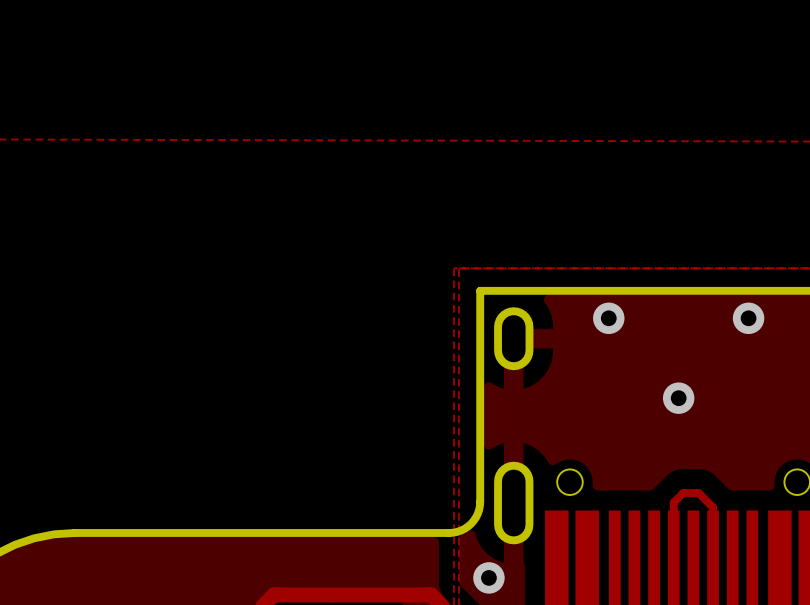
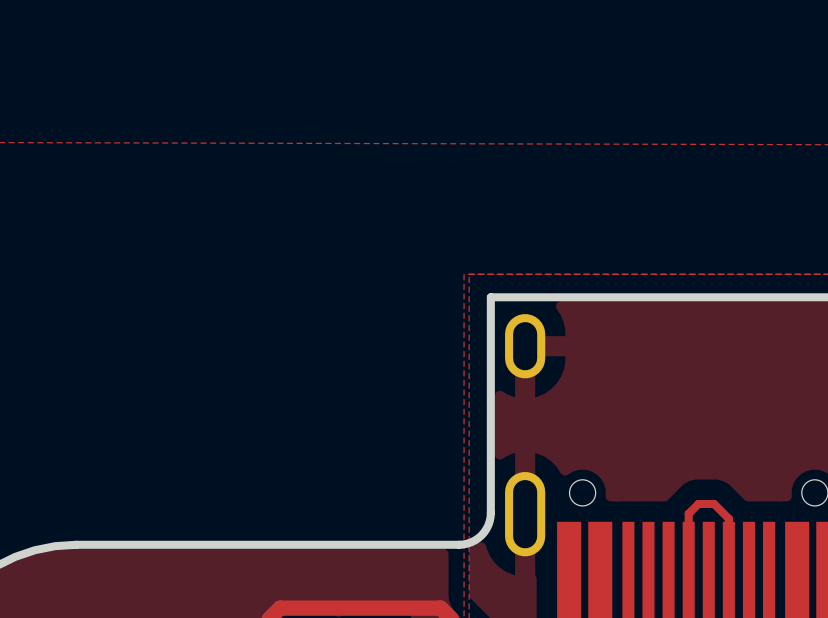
via: (608, 318) -> none
via: (748, 318) -> none
via: (678, 398) -> none
via: (488, 577) -> none

